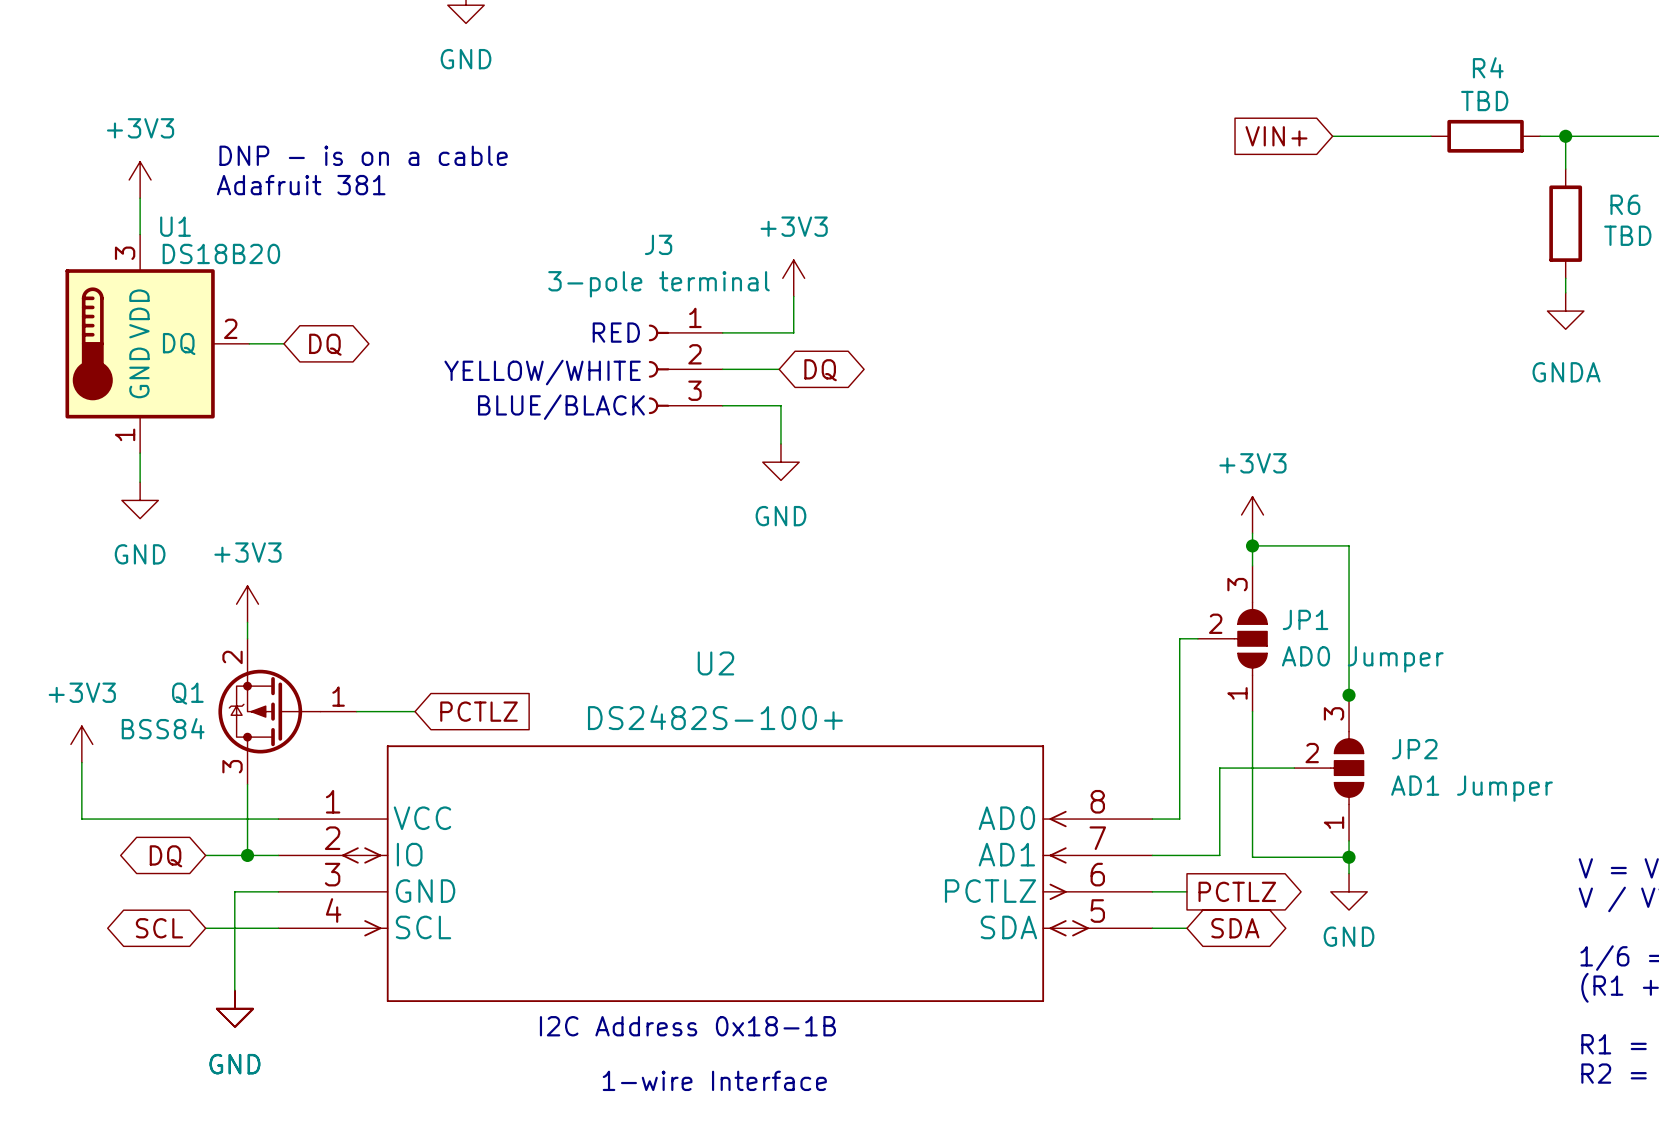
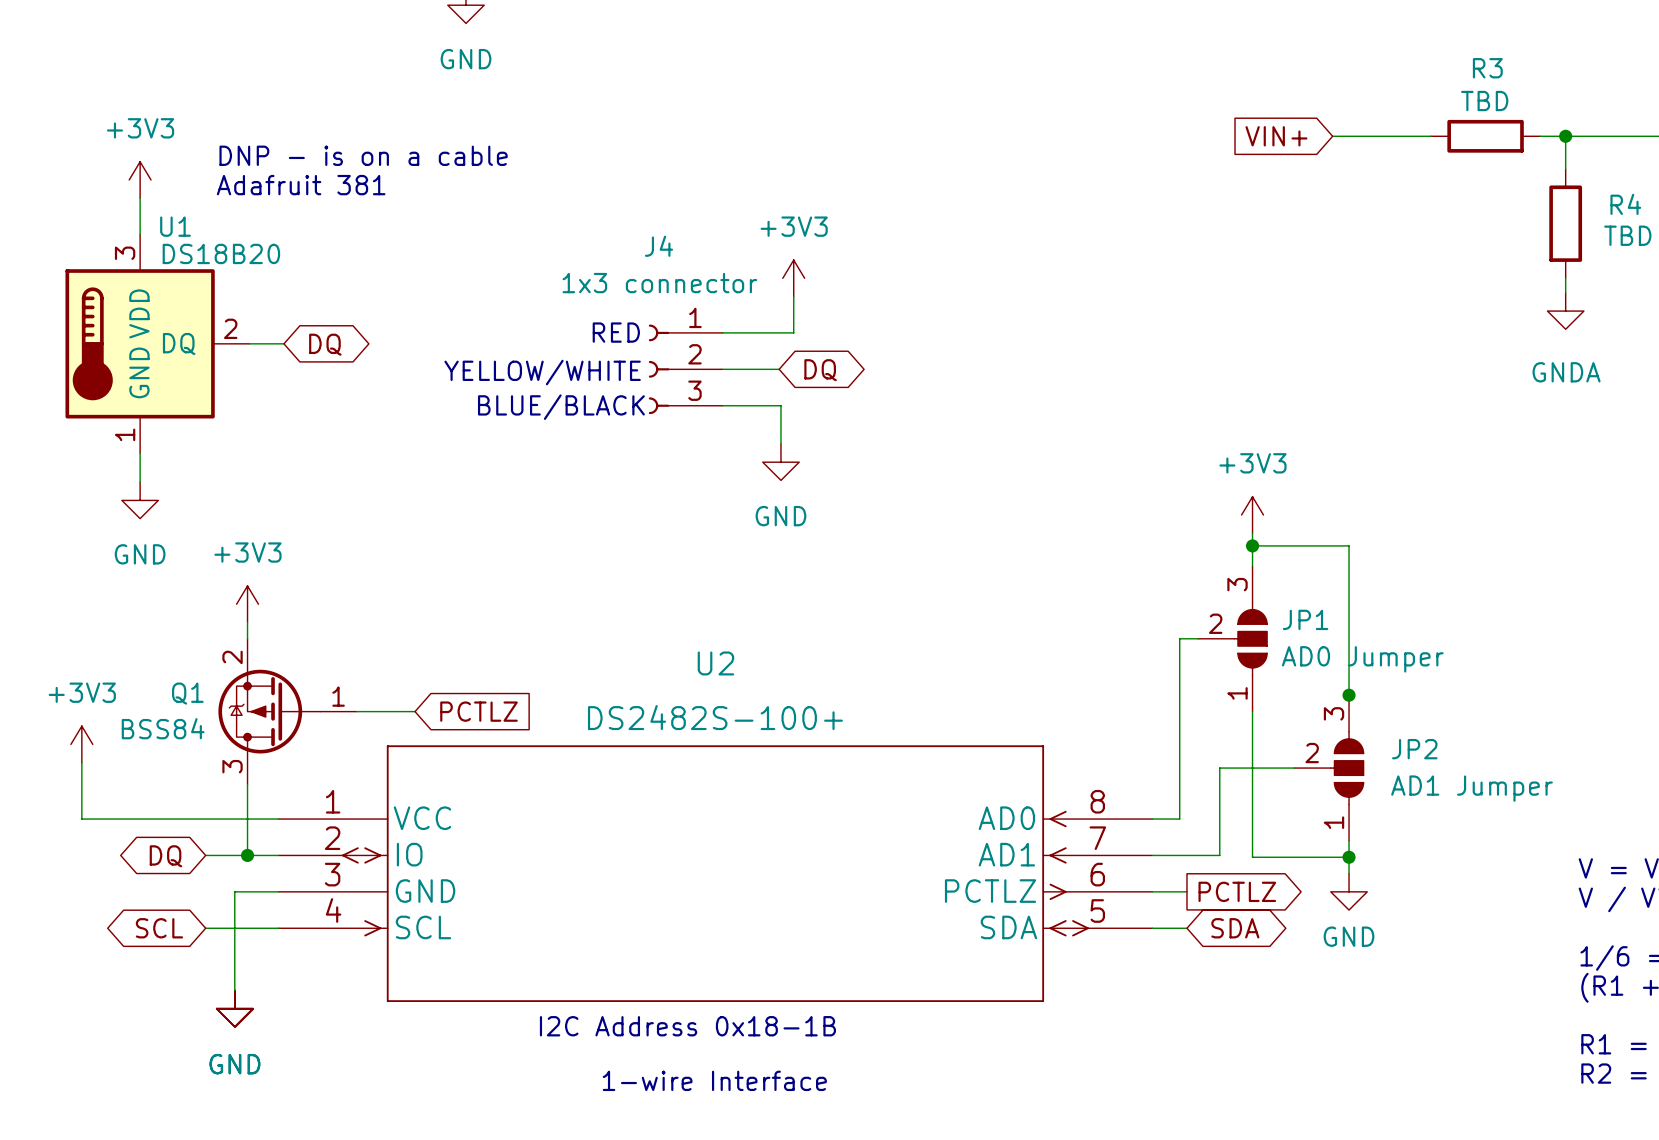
R4 name: R4 (1488, 67) -> R3 (1487, 68)
R6 name: R6 (1625, 204) -> R4 (1625, 204)
J3 name: J3 (658, 244) -> J4 (659, 246)
J3 value: 3-pole terminal (659, 284) -> 1x3 connector (659, 283)

